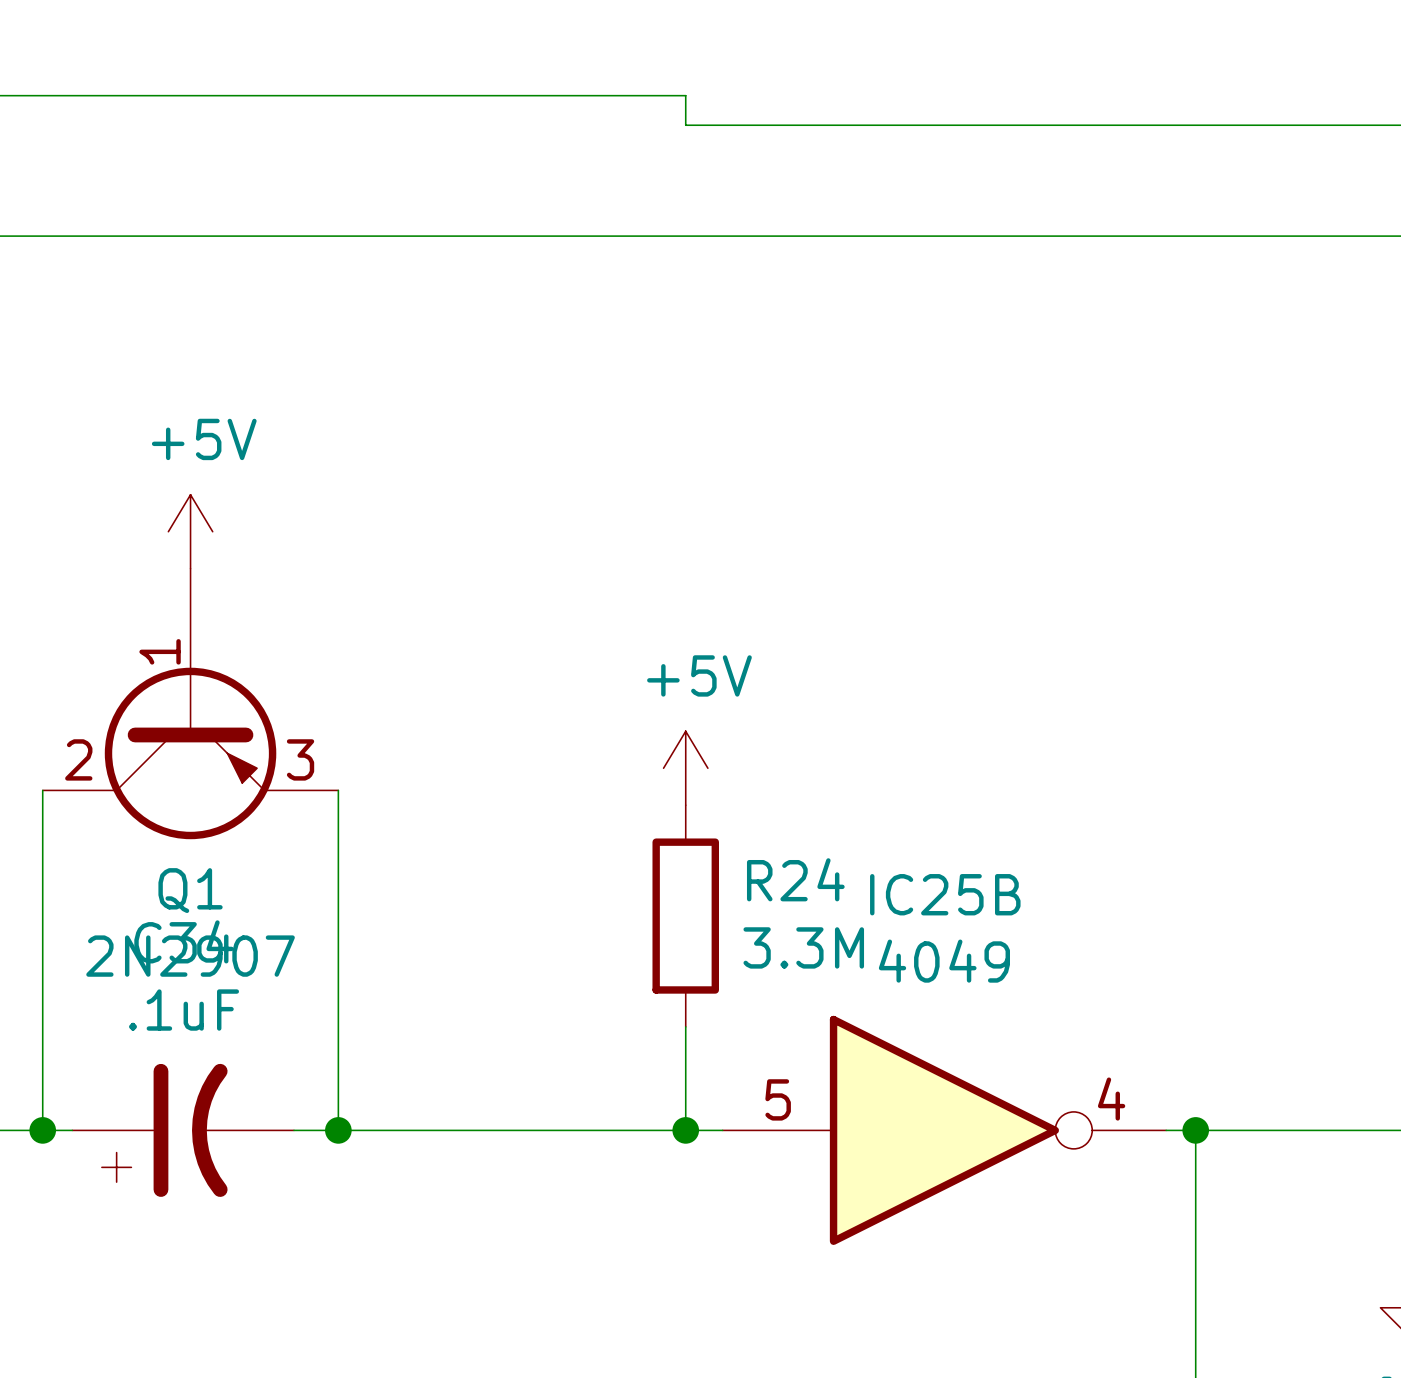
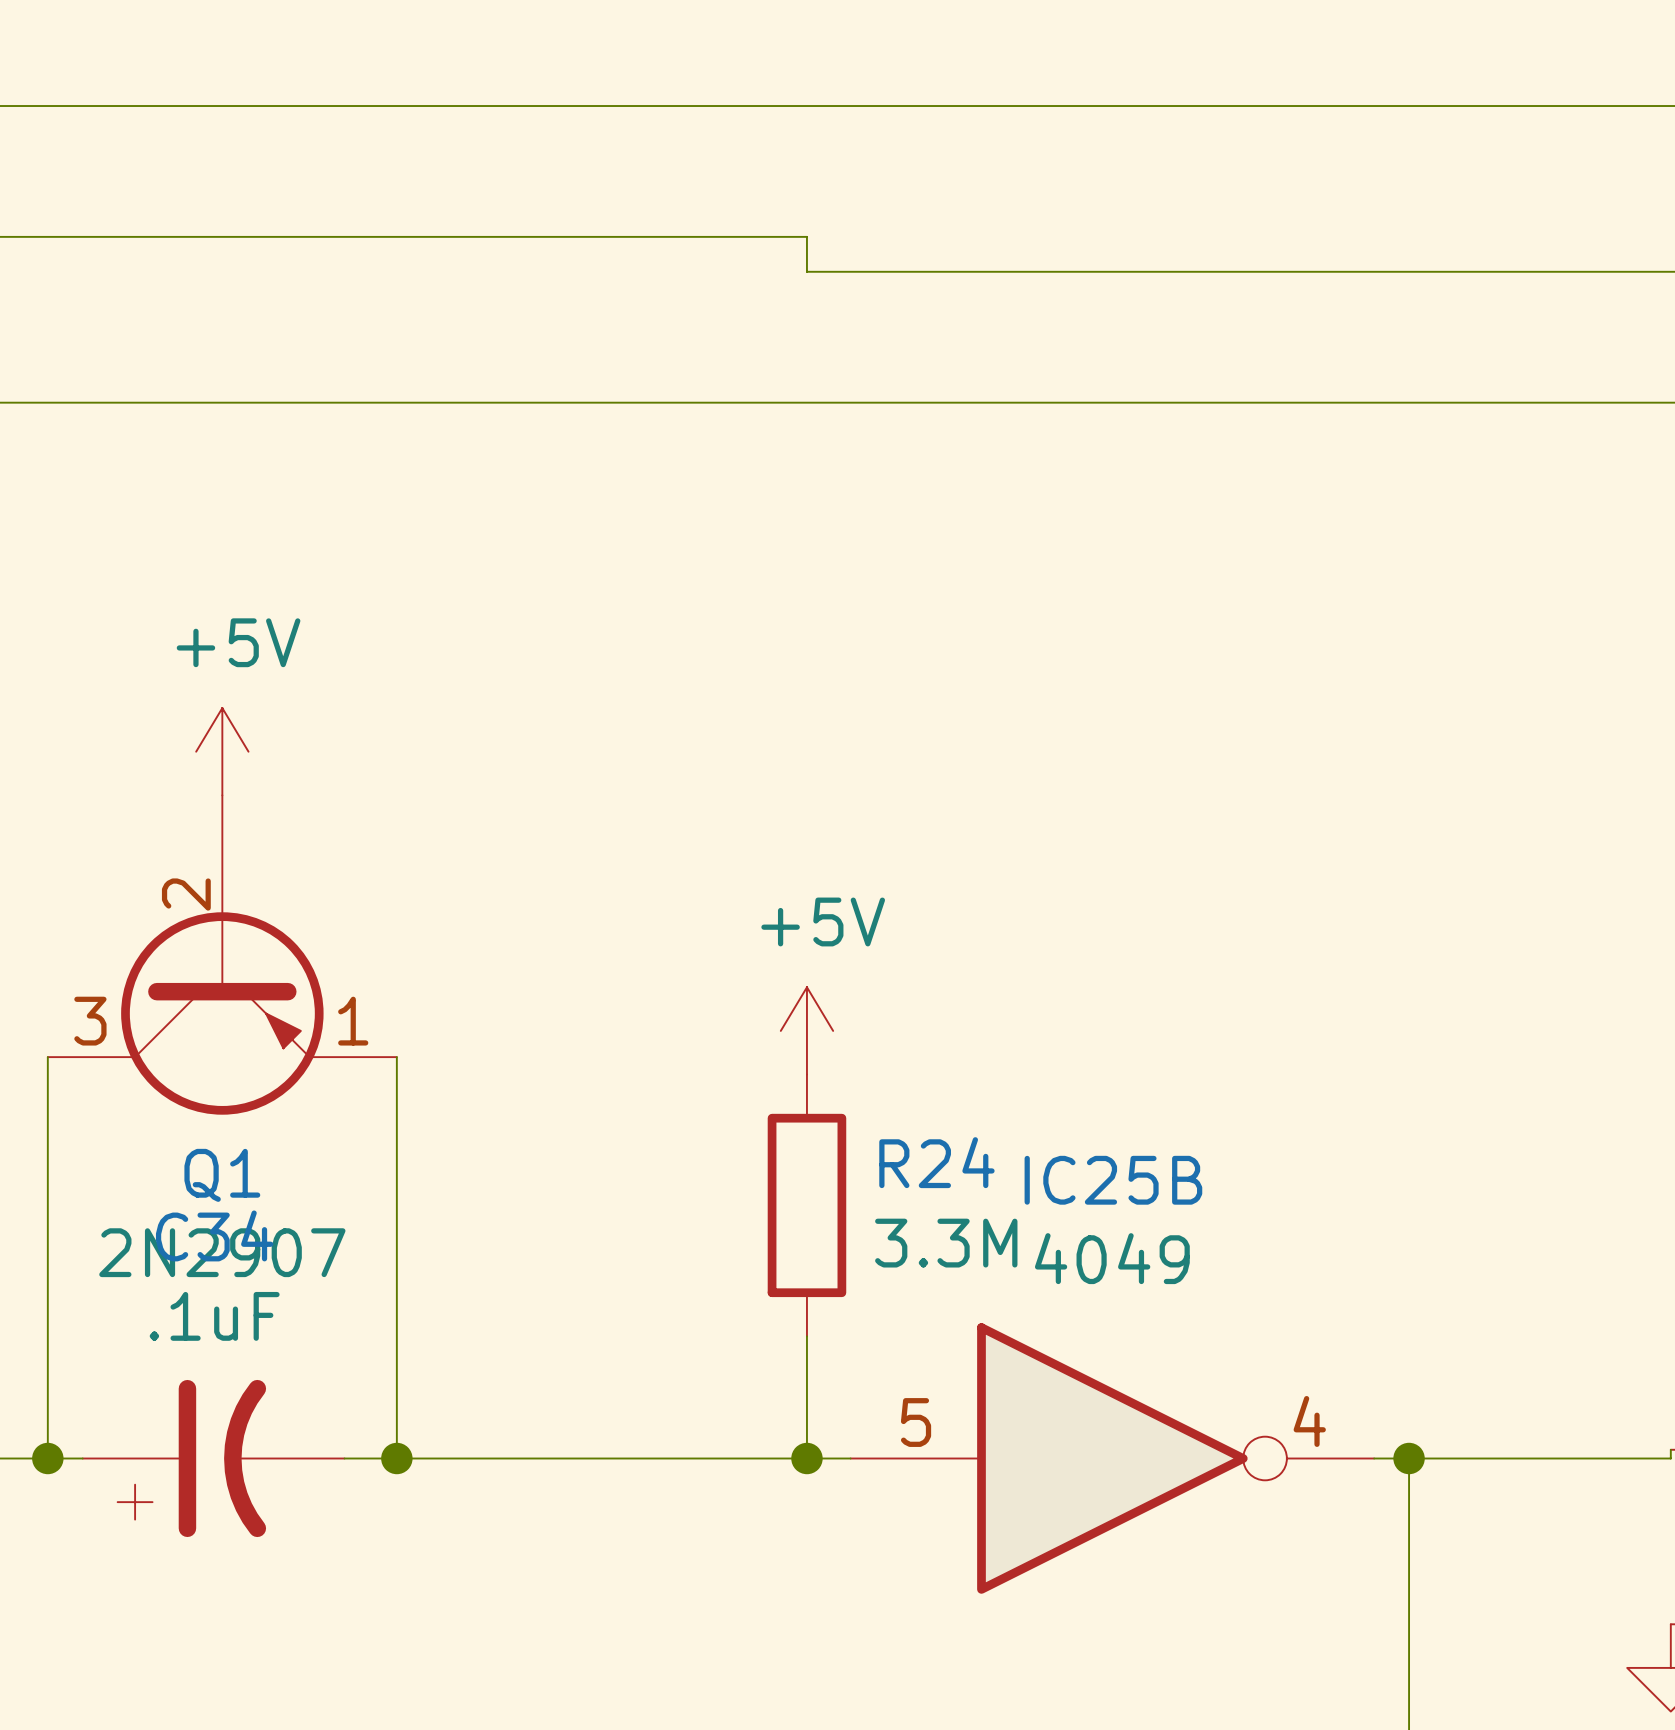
Q1 pin number: 1 (160, 651) -> 2 (186, 894)
Q1 pin number: 2 (78, 759) -> 3 (90, 1021)
Q1 pin number: 3 (300, 759) -> 1 (353, 1021)

